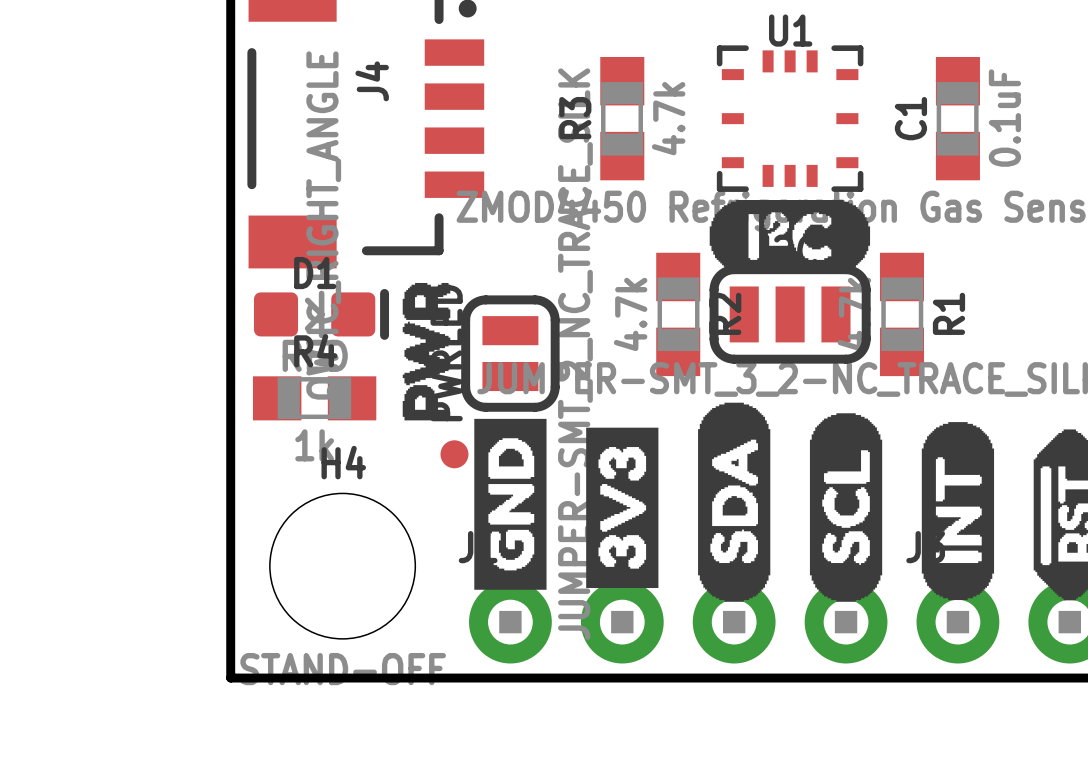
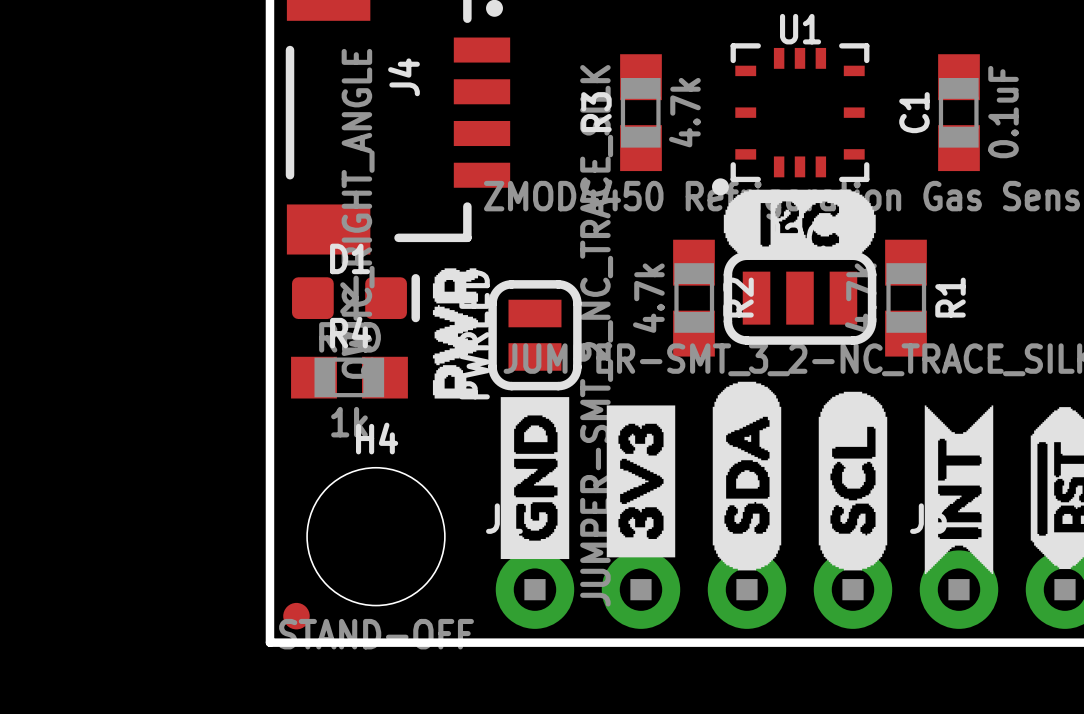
U1 footprint: [716, 45, 864, 192] -> [712, 43, 870, 196]
drawing shape: [921, 422, 995, 601] -> [924, 405, 994, 575]
part position: (454, 454) -> (296, 616)

